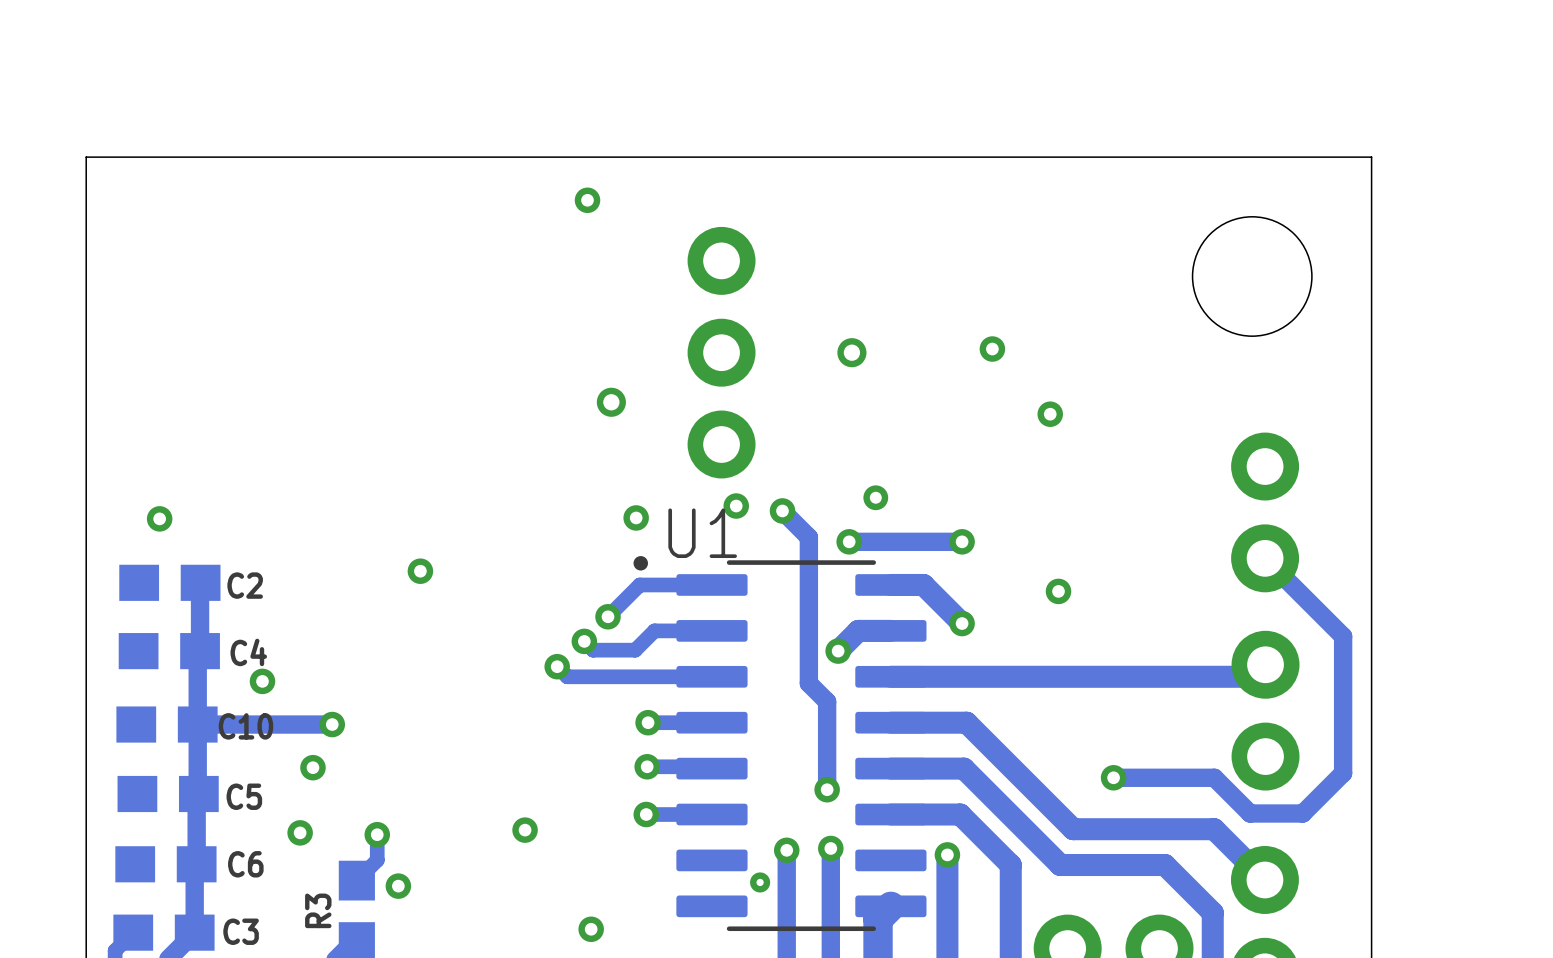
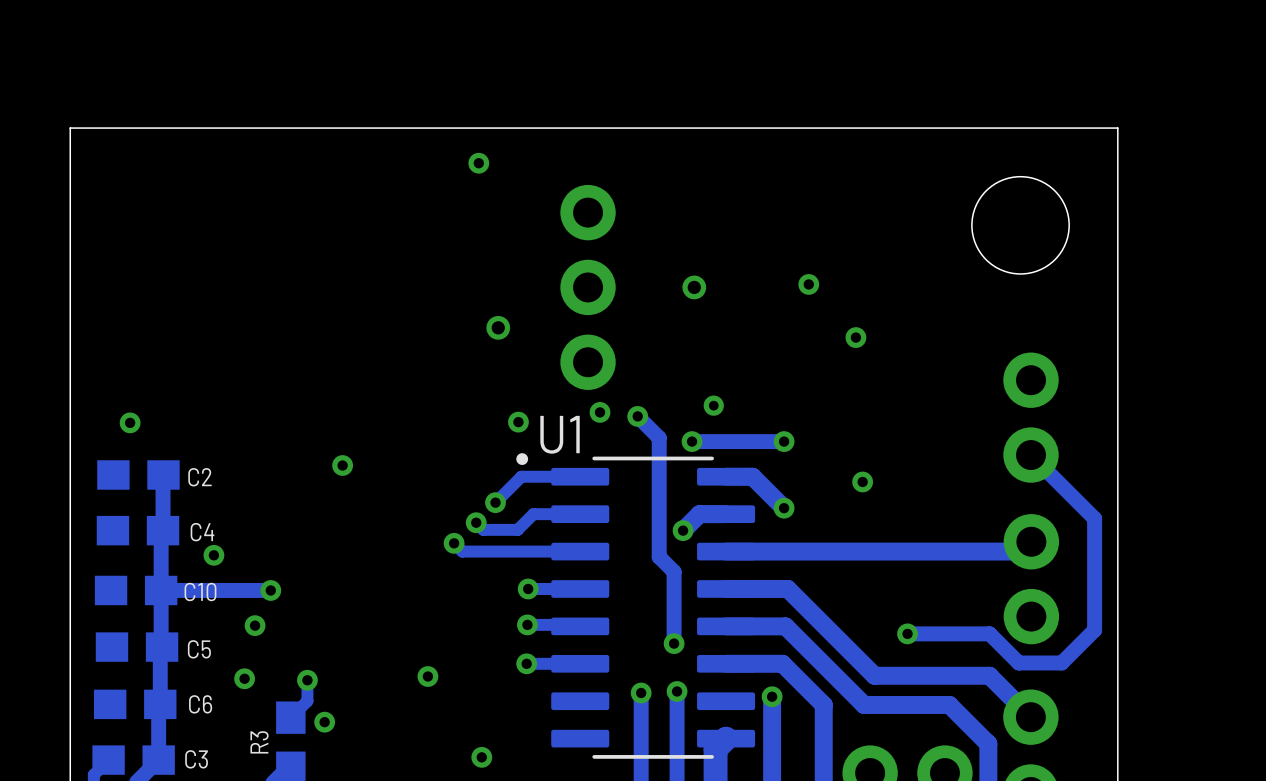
via: (760, 882) -> none

